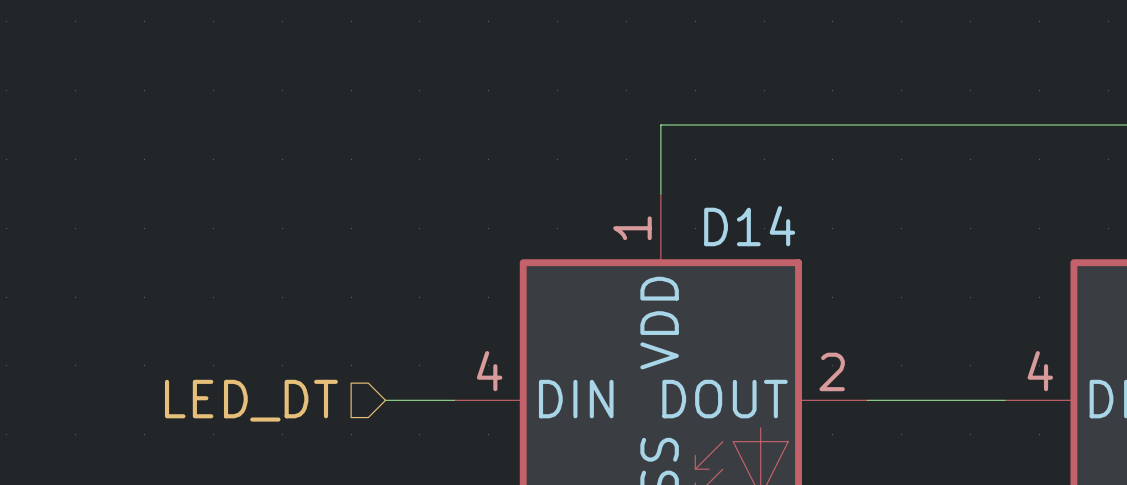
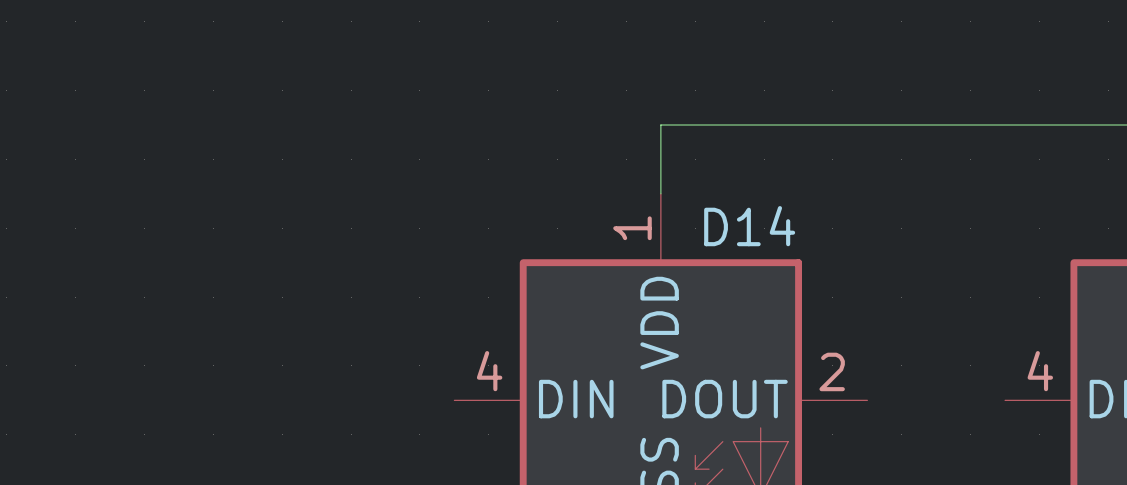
hierarchical label: LED_DT (251, 400) -> none
wire: (385, 400) (454, 400) -> none
wire: (867, 400) (1005, 400) -> none

